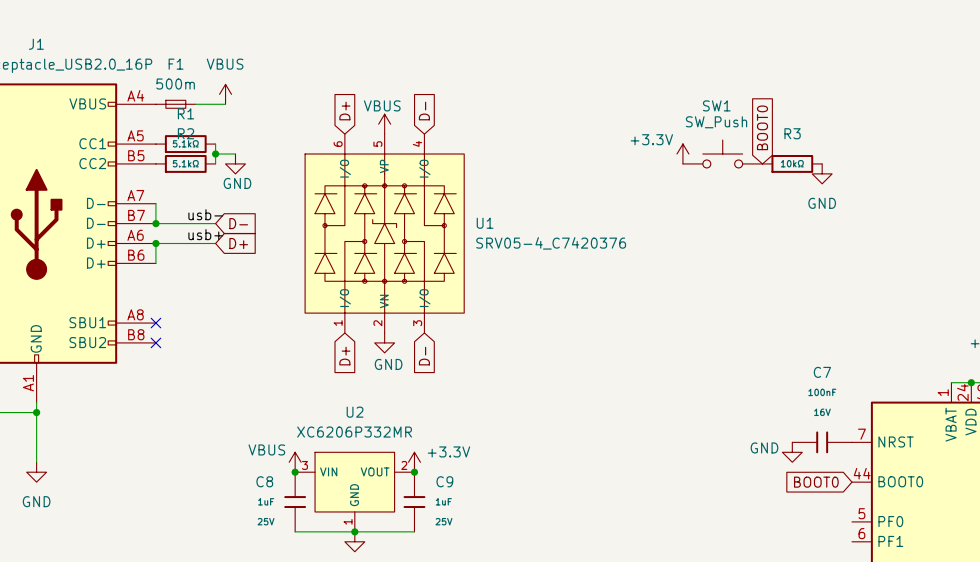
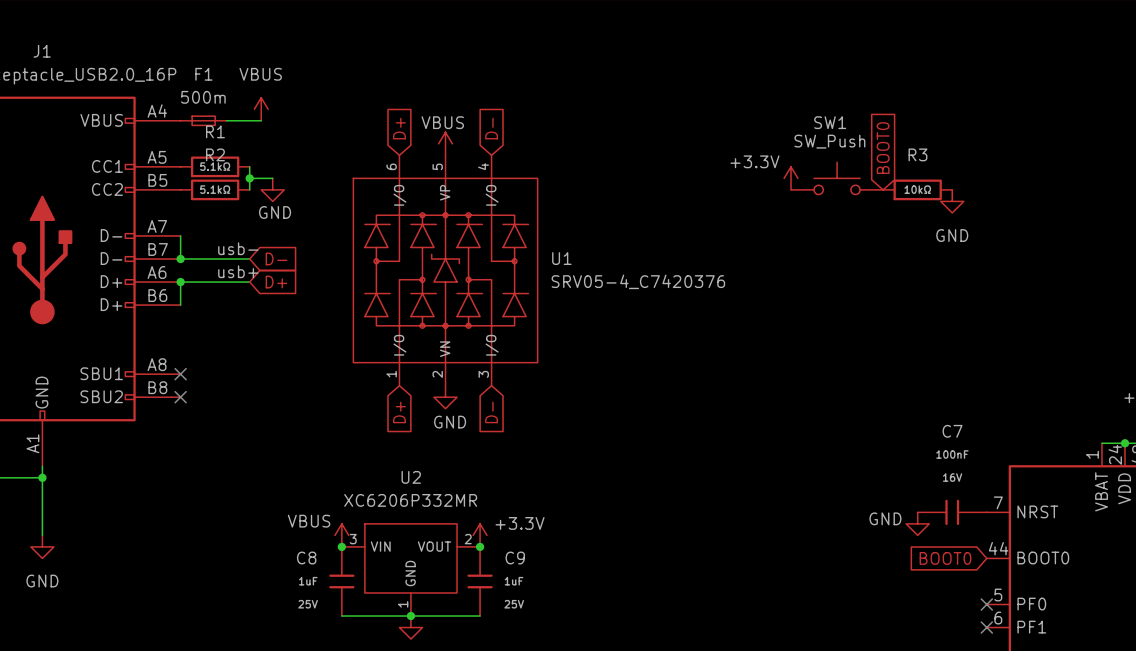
no-connect mark: none -> (986, 604)
no-connect mark: none -> (986, 627)

